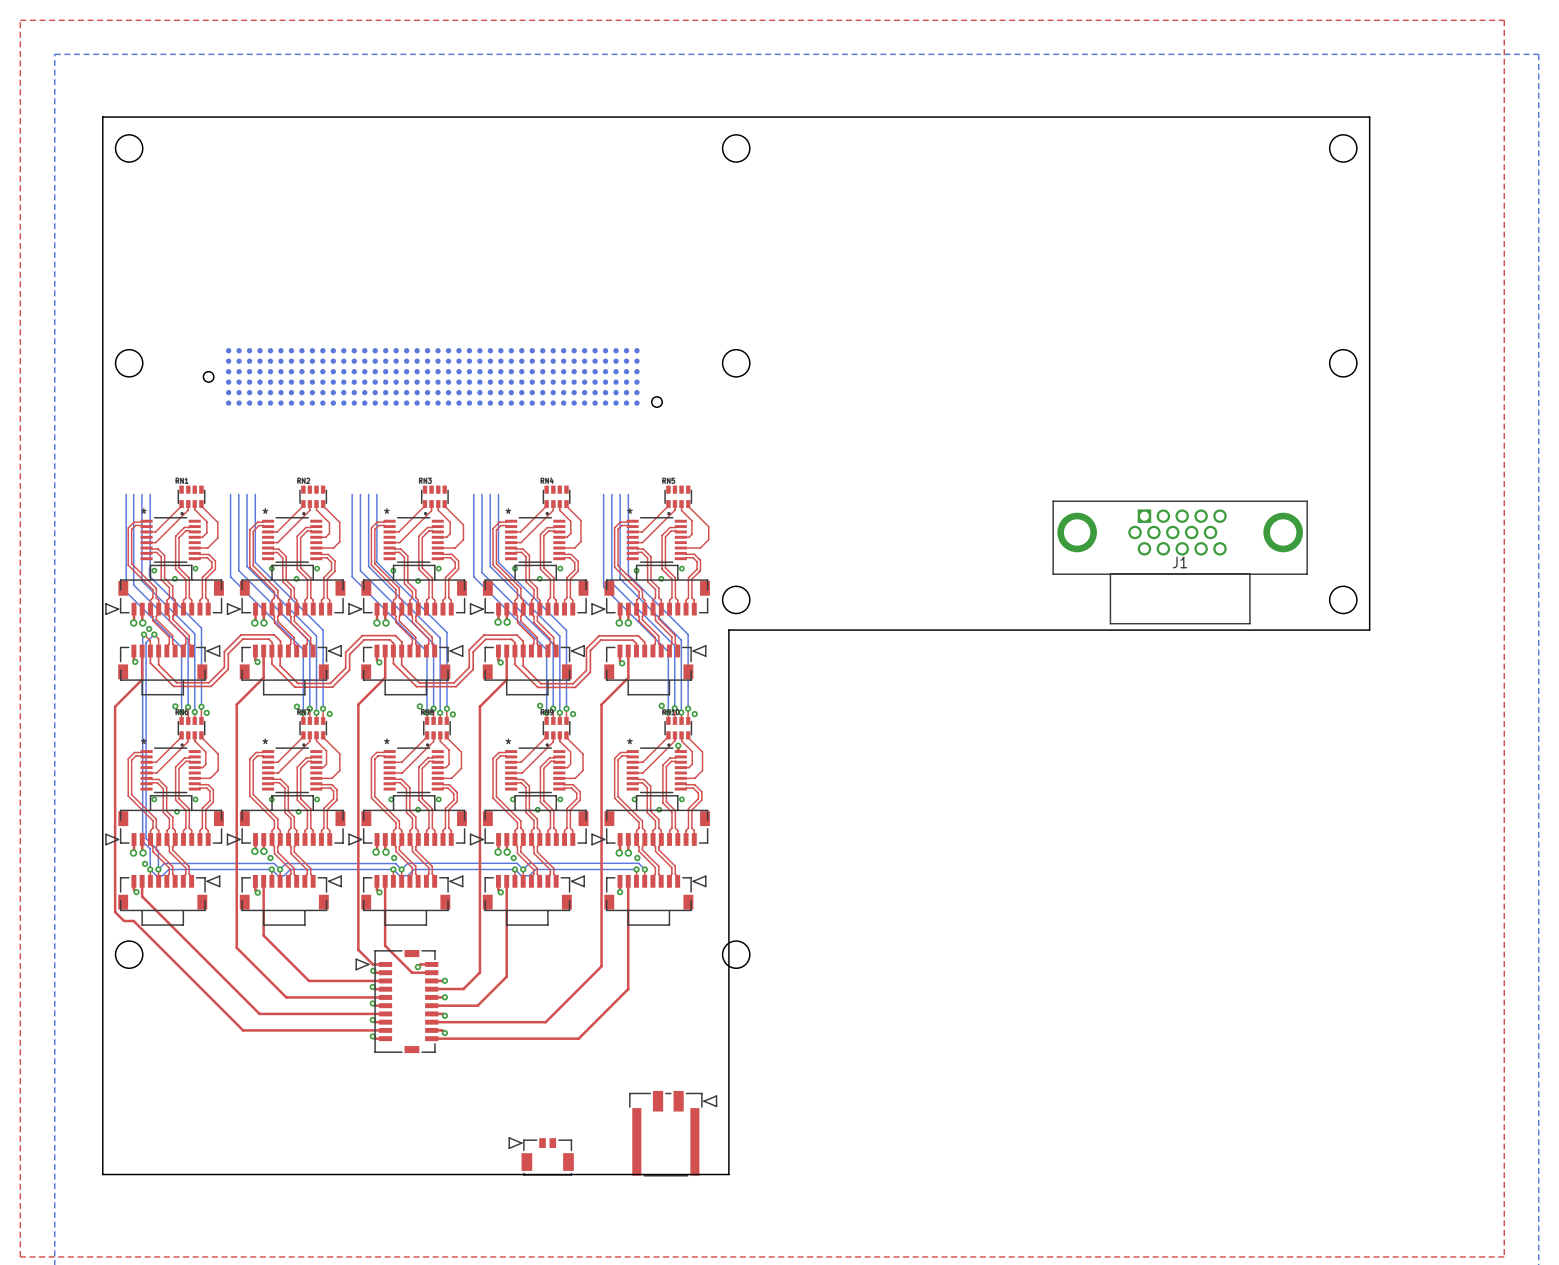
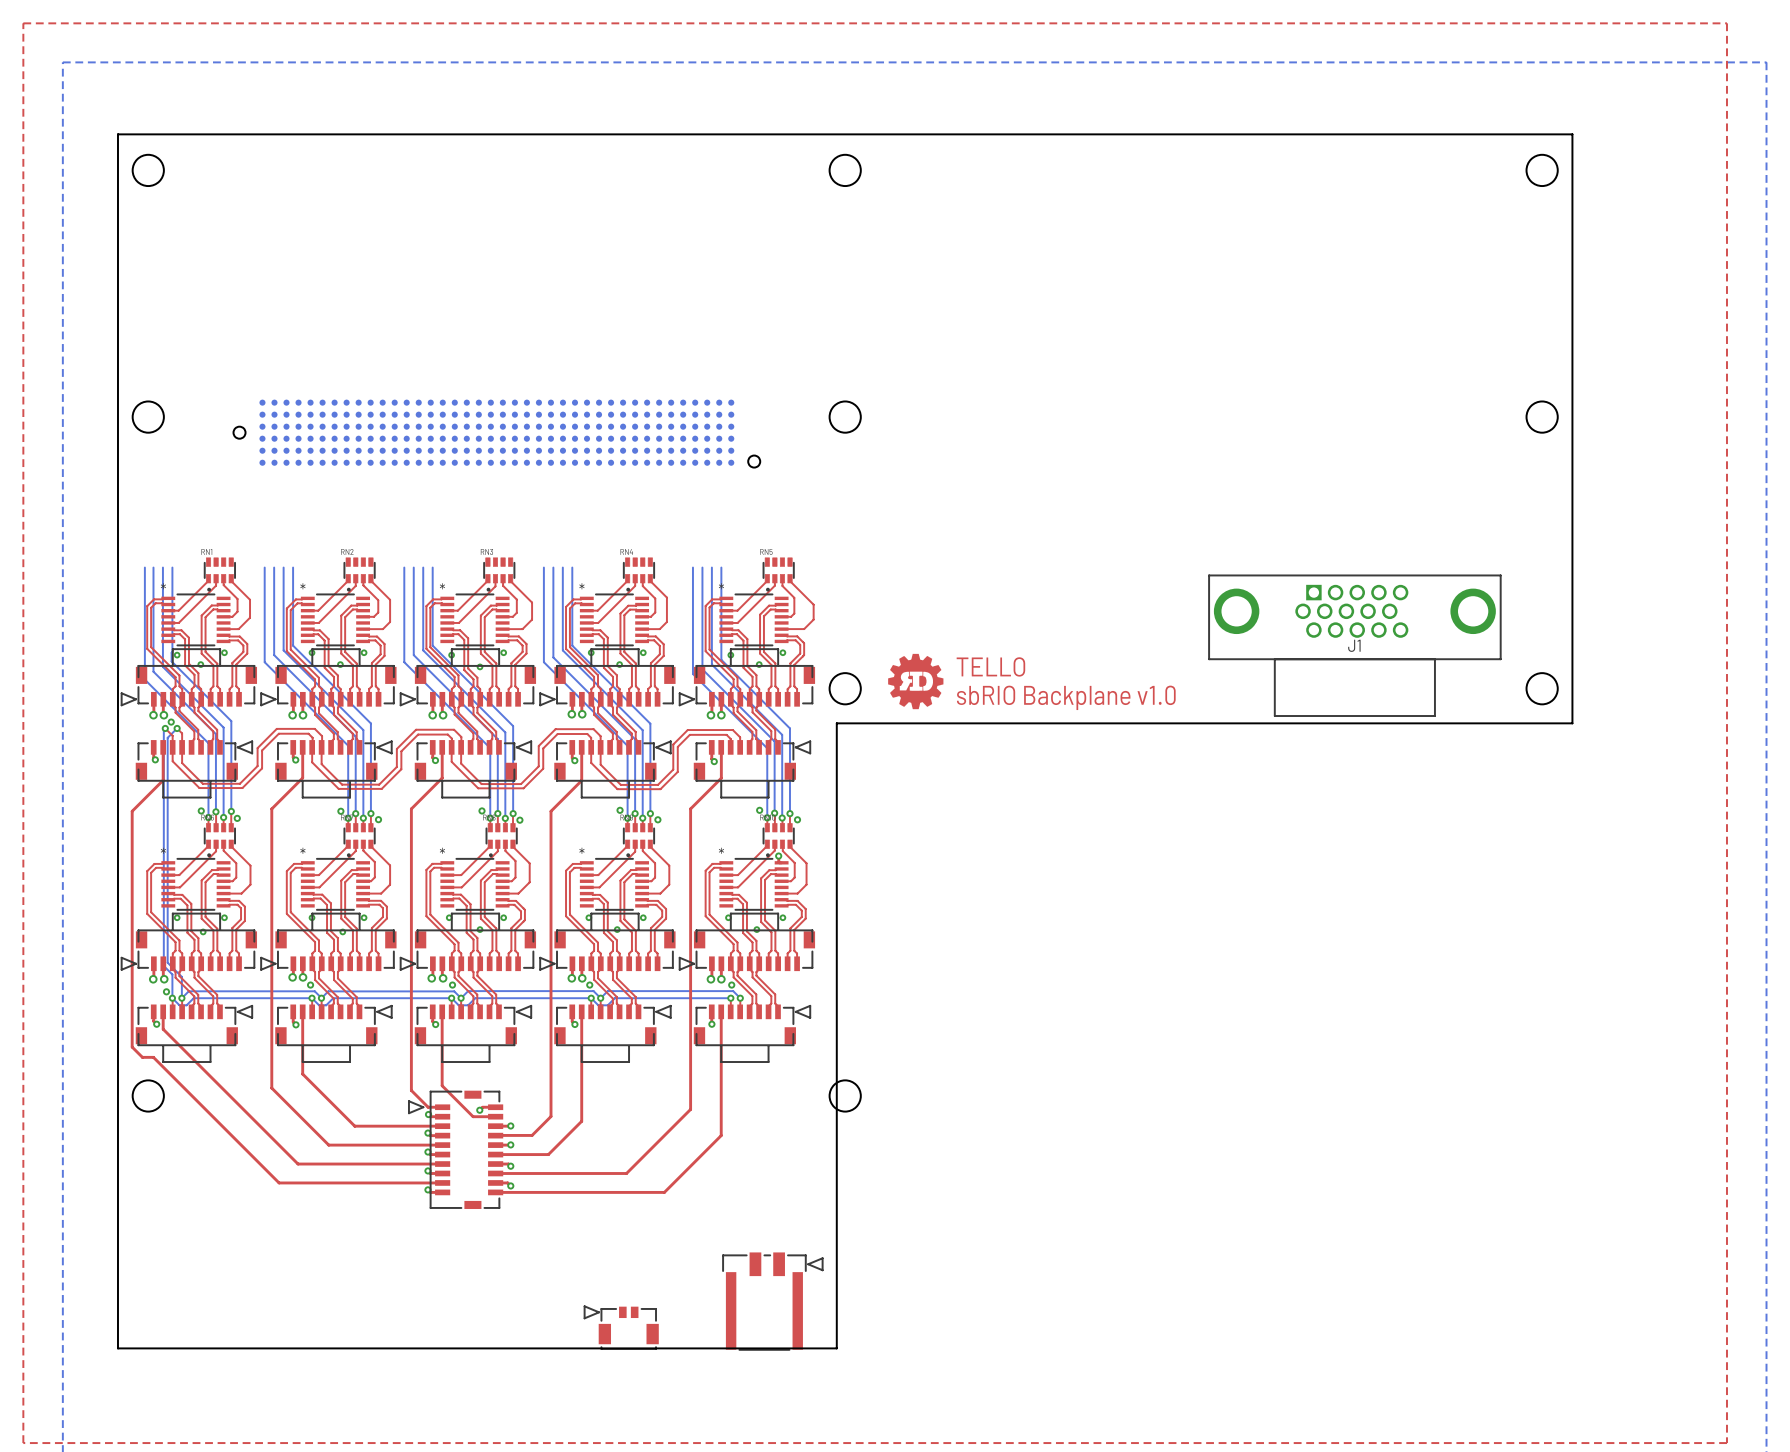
drawing: none -> [888, 653, 944, 710]
text: none -> TELLO (990, 666)
text: none -> sbRIO Backplane v1.0 (1066, 697)

